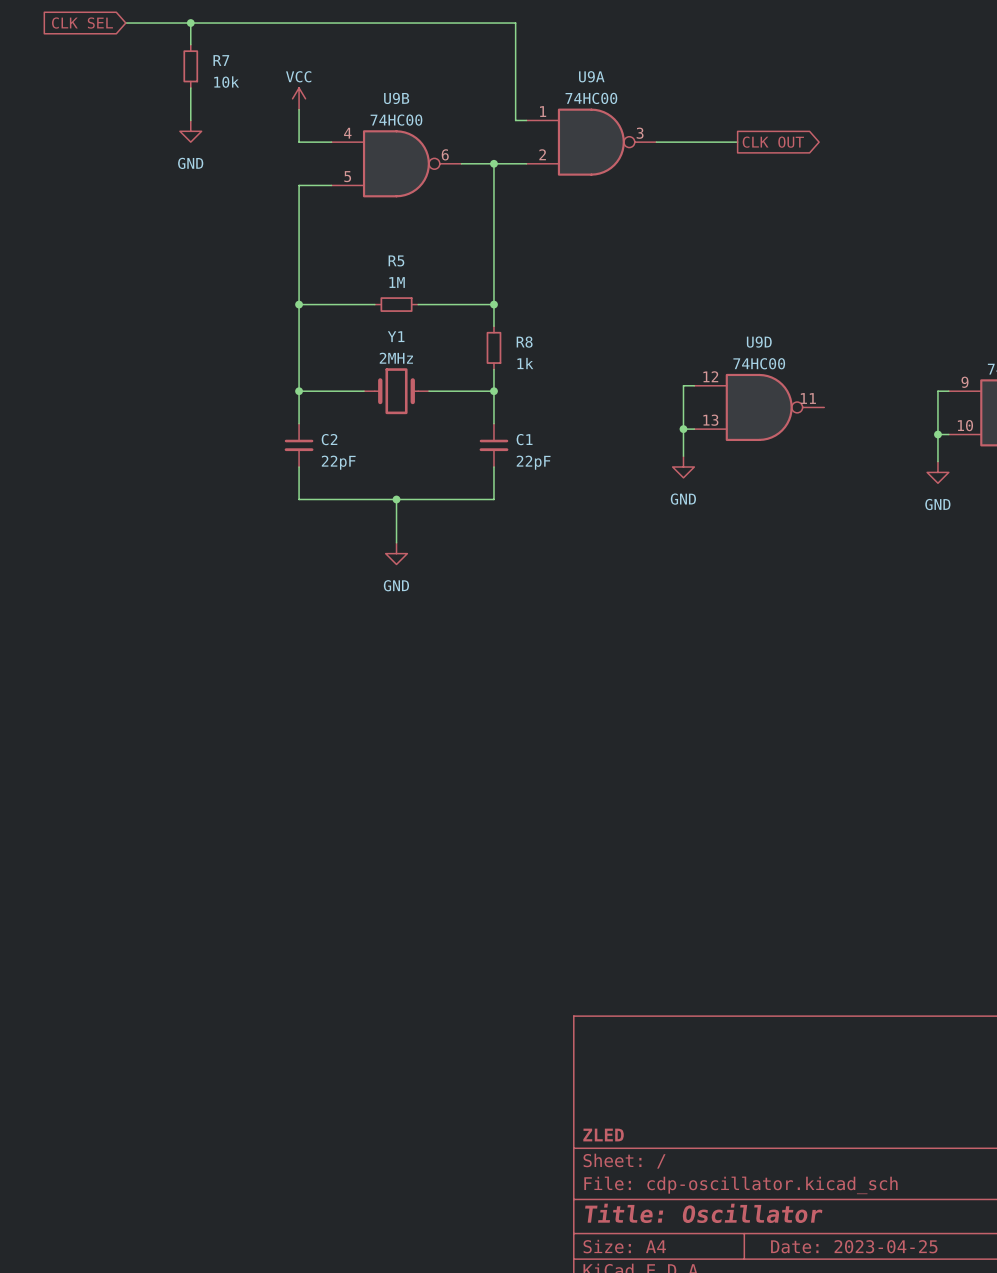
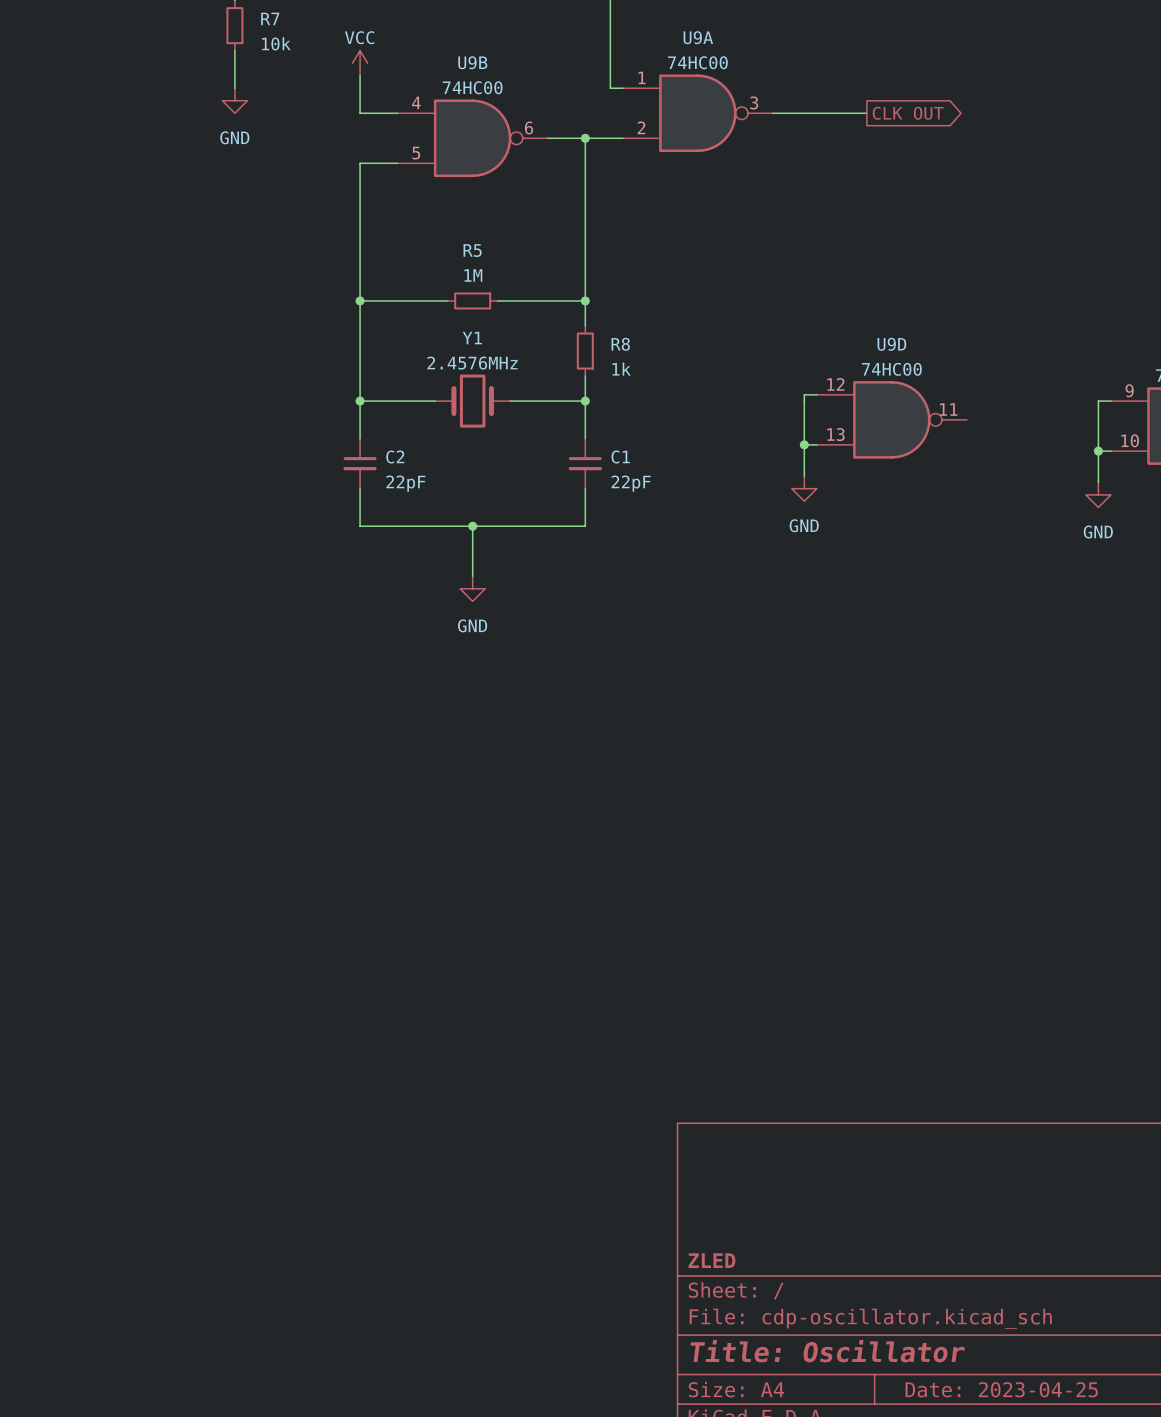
Y1 value: 2MHz (396, 358) -> 2.4576MHz (472, 363)

